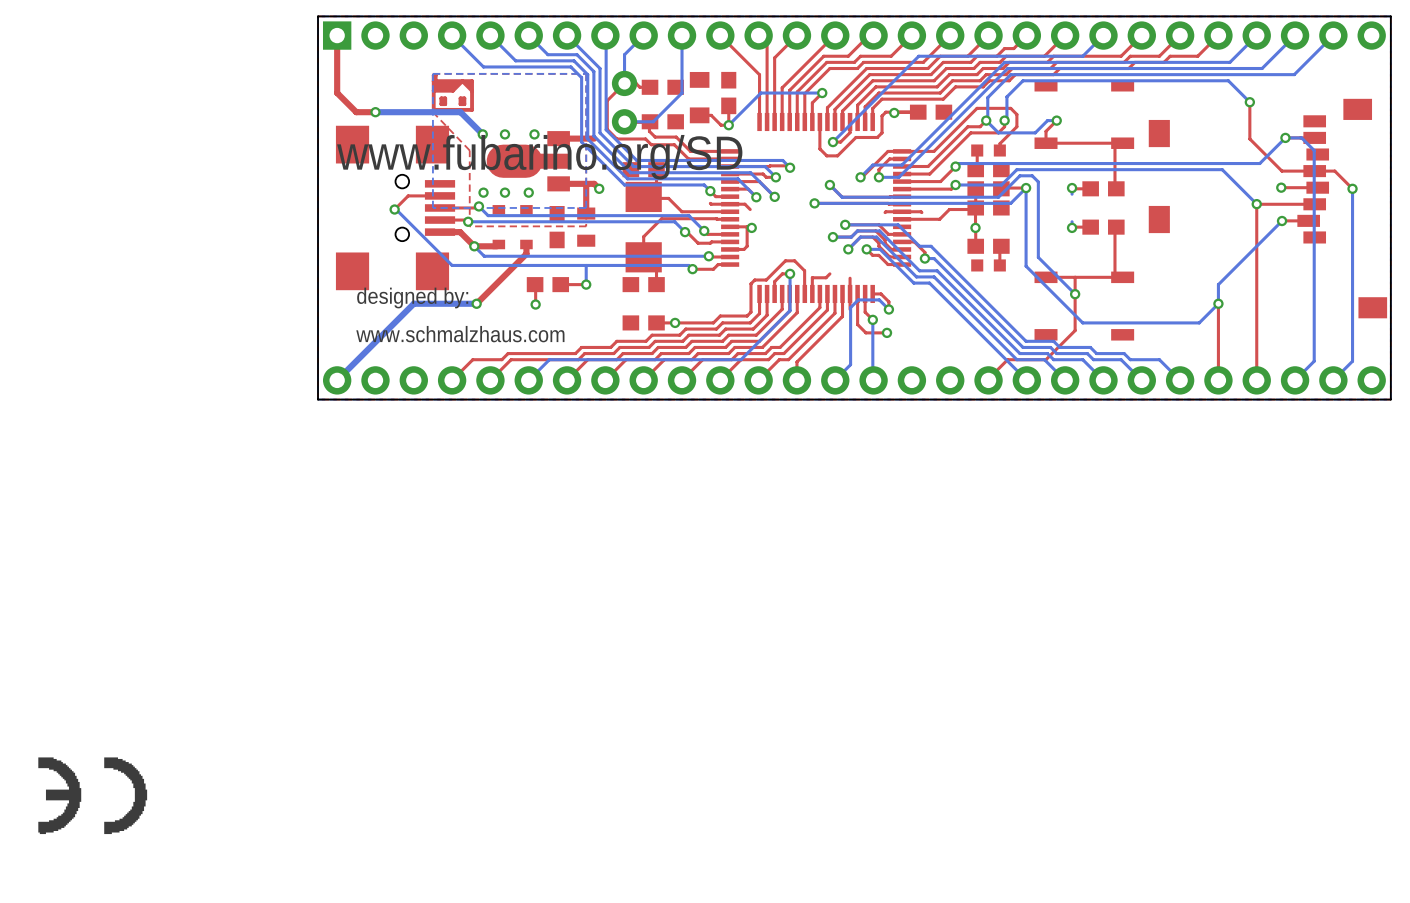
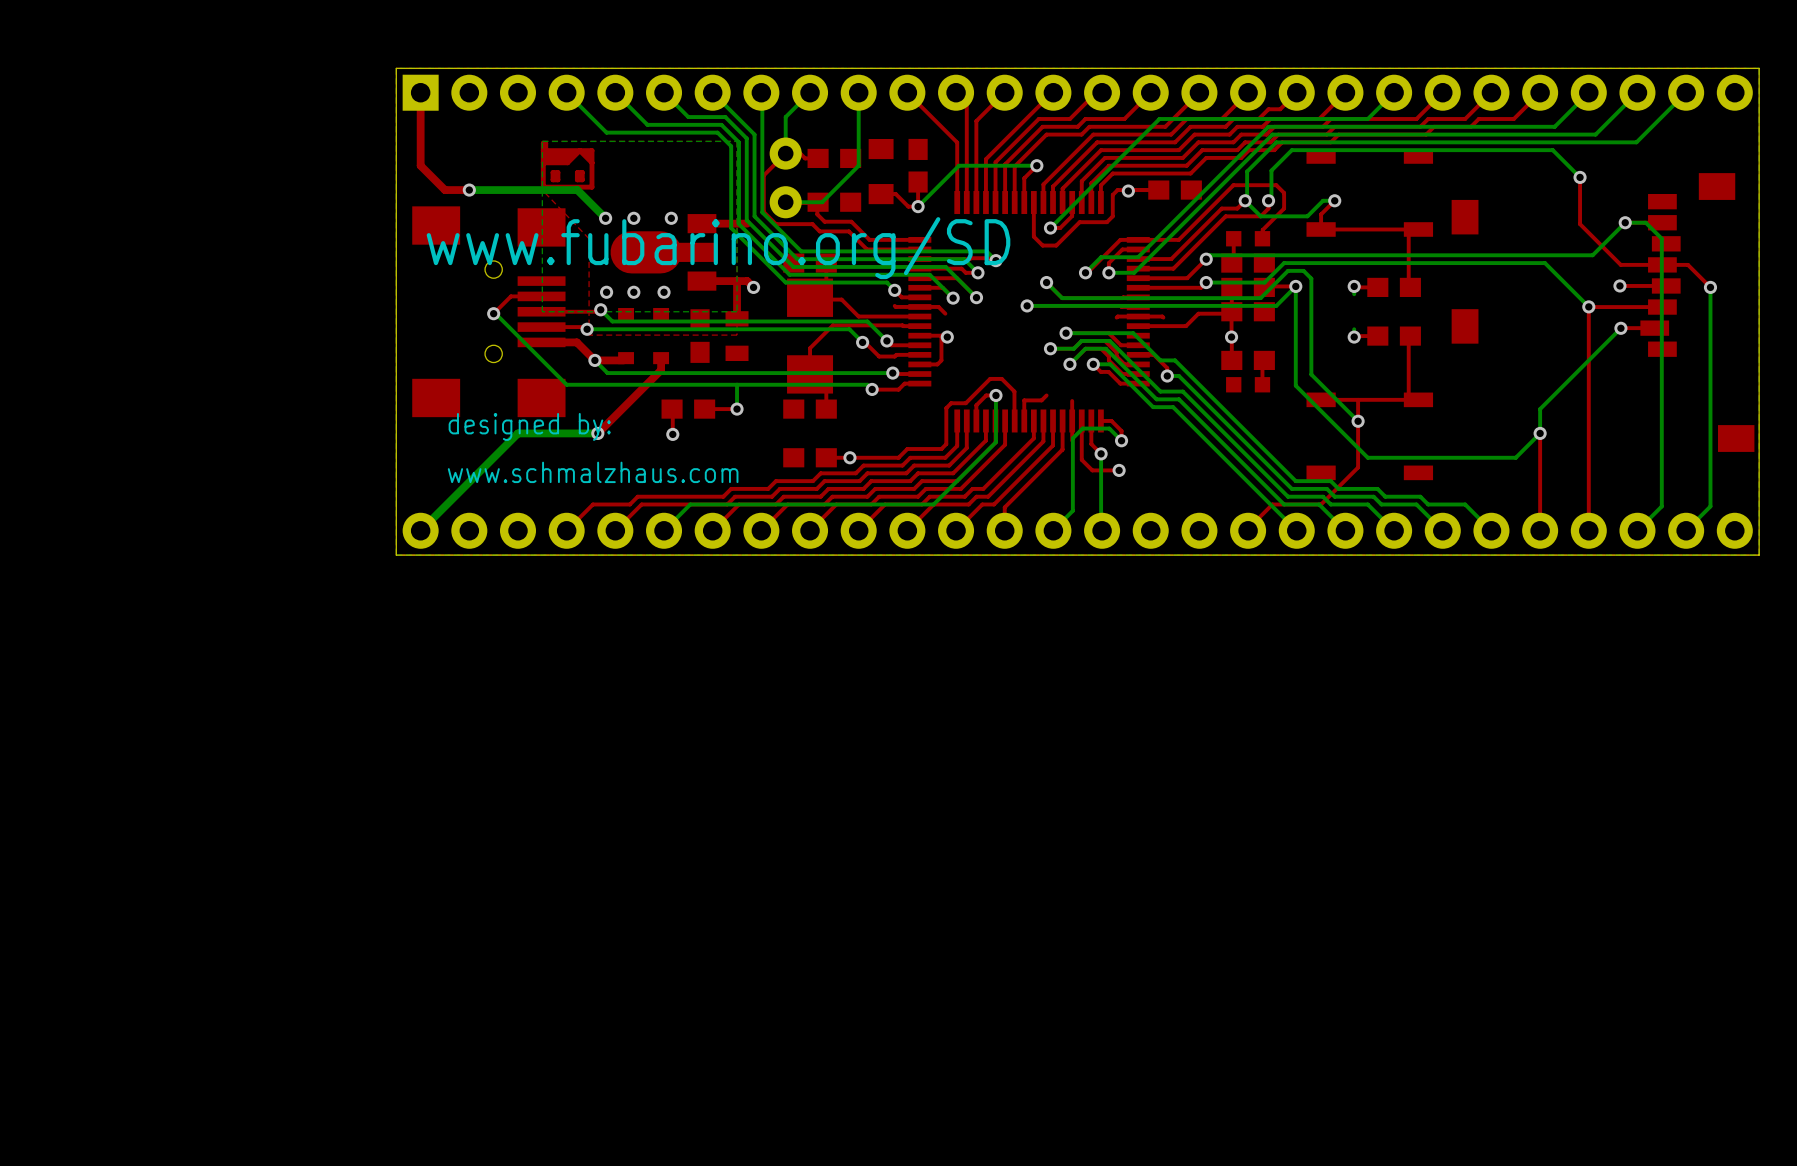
part footprint: [335, 125, 456, 291] -> [412, 206, 566, 418]
drawing: [38, 757, 82, 835] -> none
drawing: [104, 757, 148, 835] -> none

